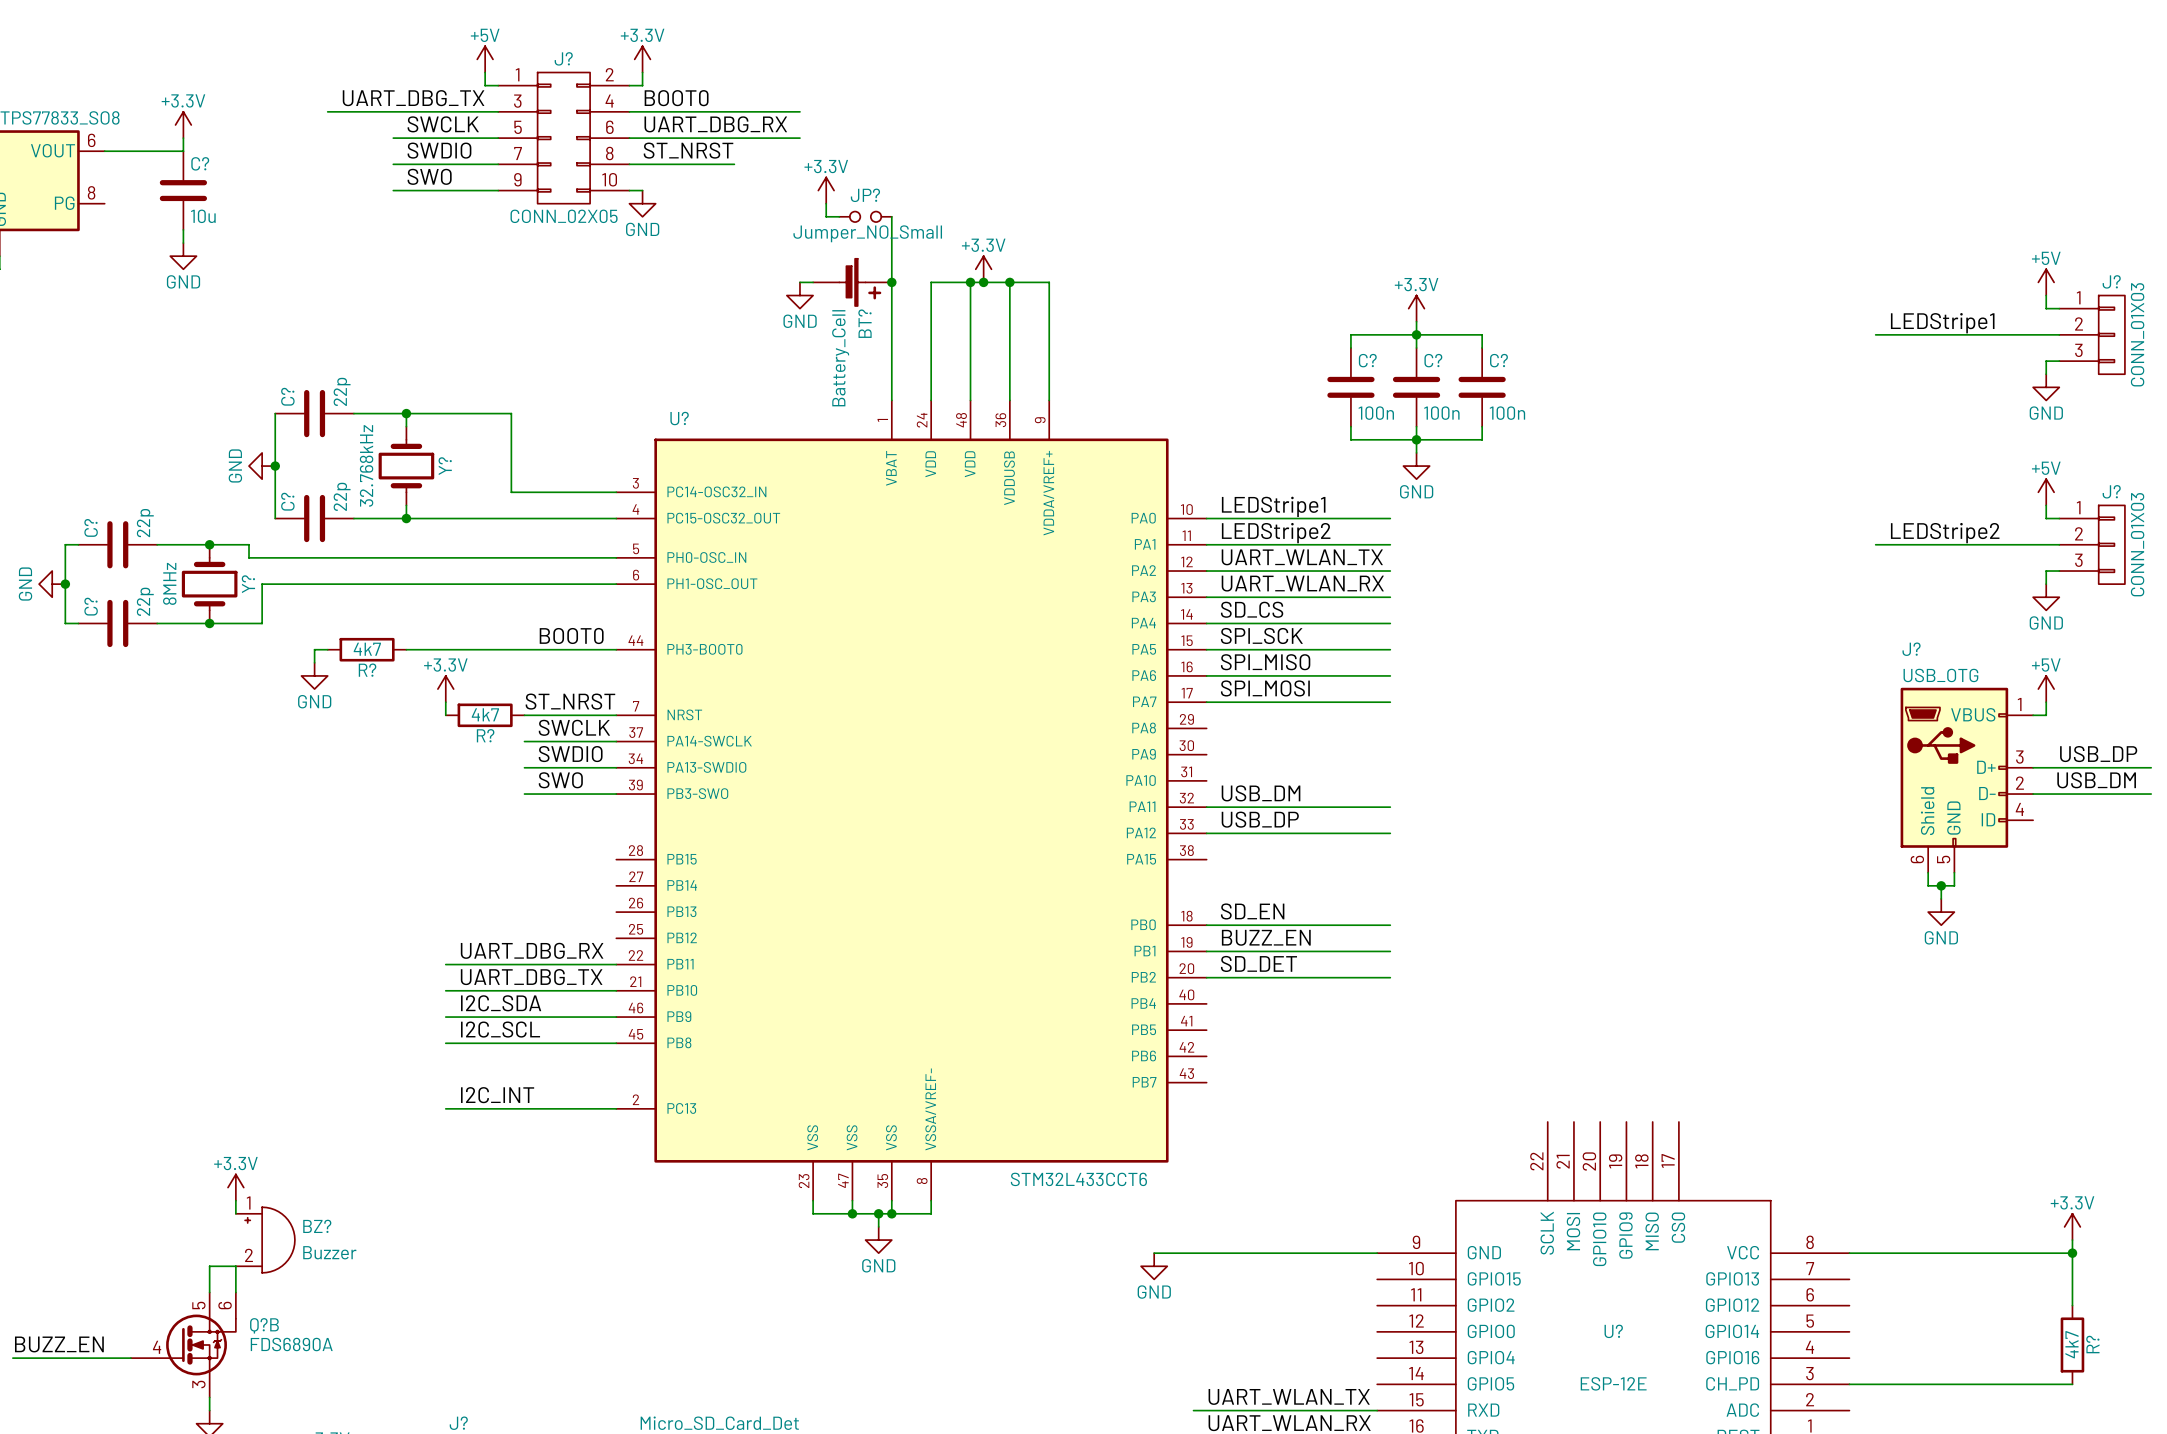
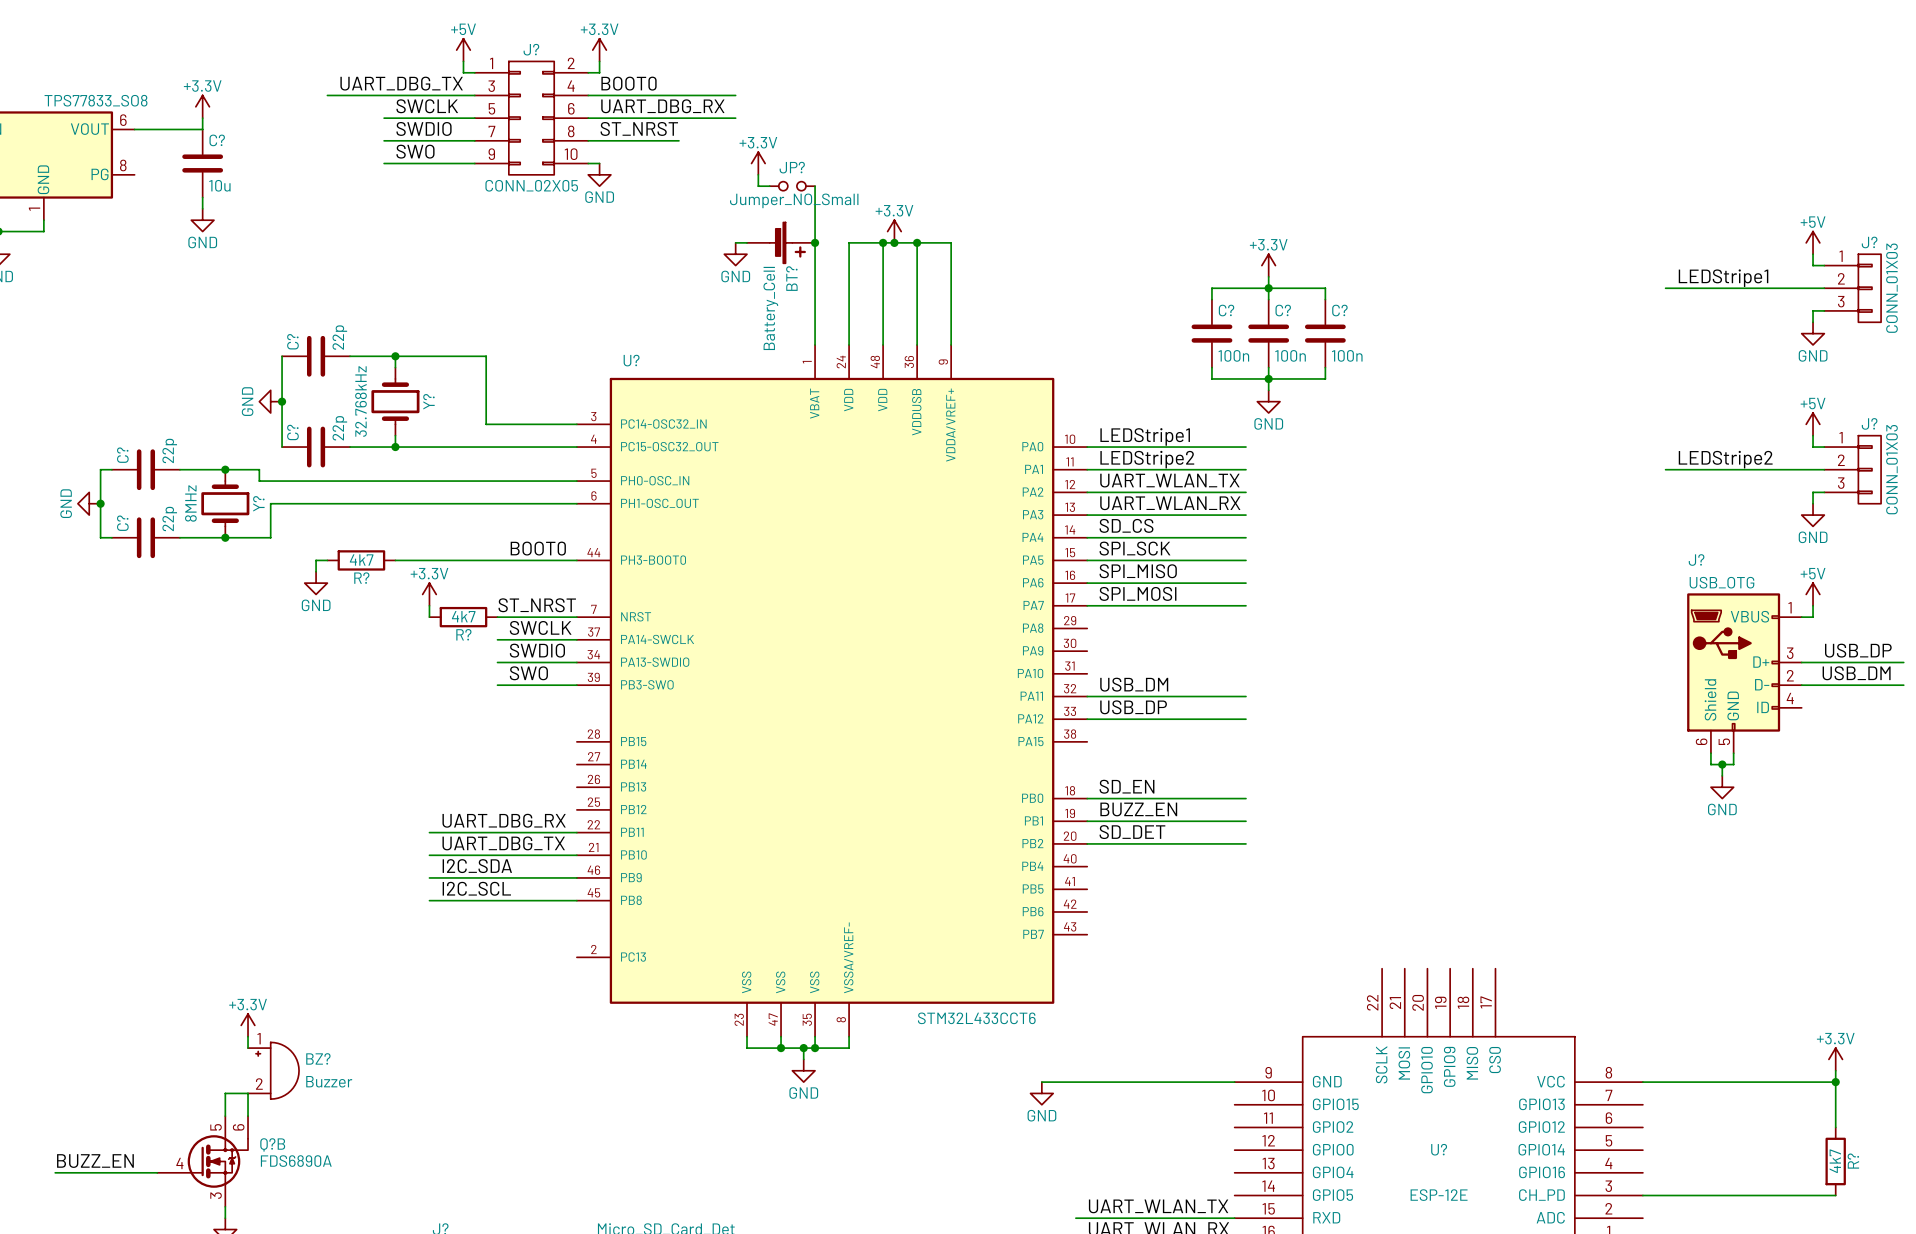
label: I2C_INT (497, 1095) -> none
wire: (445, 1108) (616, 1108) -> none

